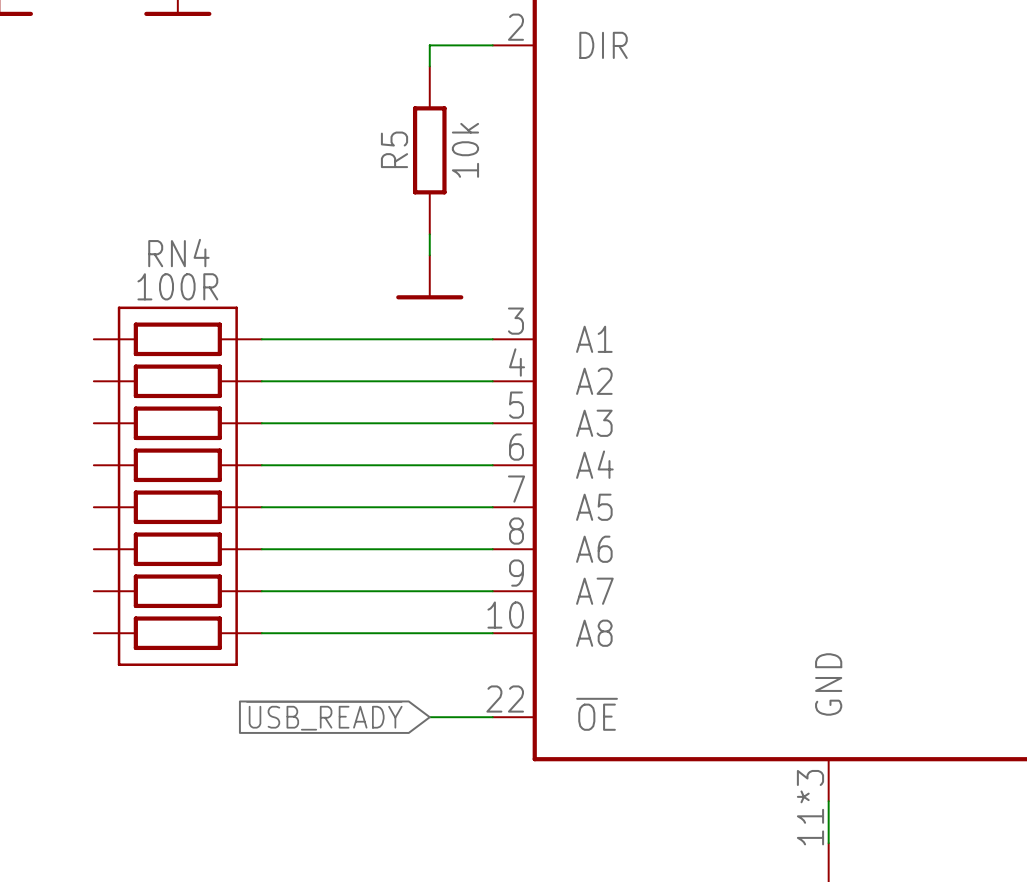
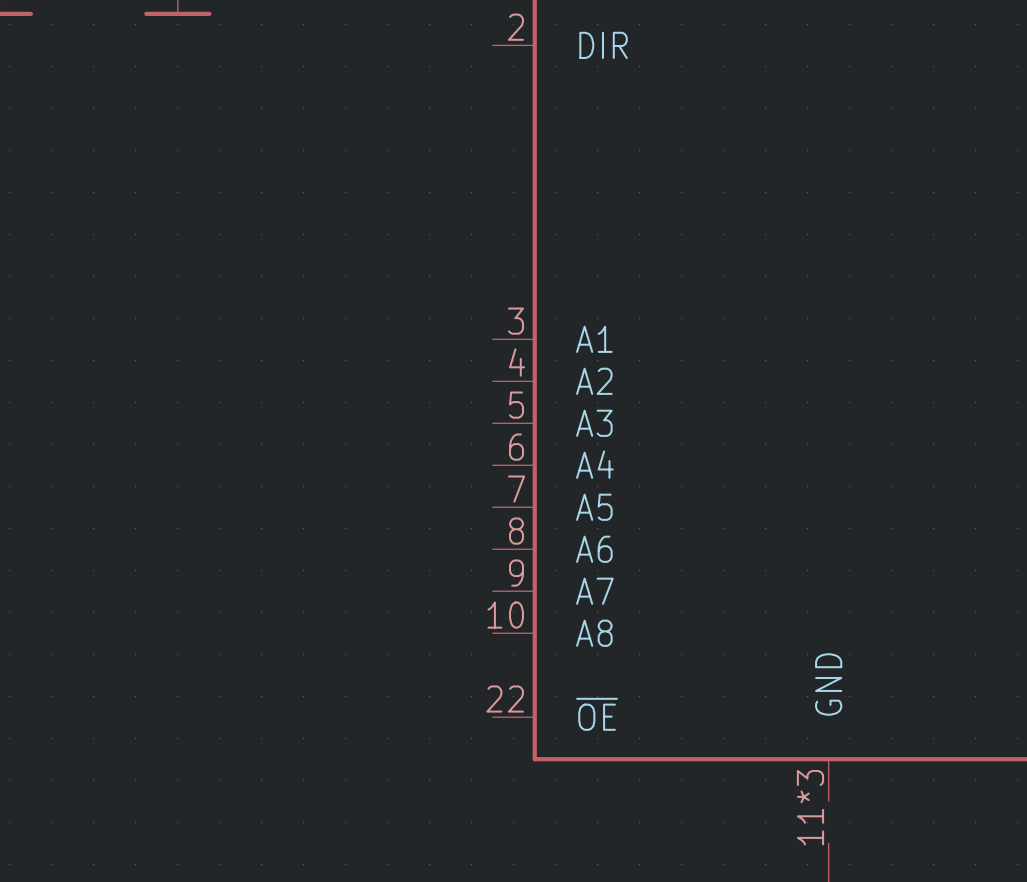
wire: (492, 45) (429, 45) (429, 66) -> none
R5: 10k (429, 150) -> none
wire: (429, 234) (429, 255) -> none
power symbol: (429, 277) -> none
wire: (261, 339) (492, 339) -> none
wire: (261, 381) (492, 381) -> none
wire: (261, 423) (492, 423) -> none
wire: (261, 465) (492, 465) -> none
RN4: 100R (177, 486) -> none
wire: (261, 507) (492, 507) -> none
wire: (261, 549) (492, 549) -> none
wire: (261, 591) (492, 591) -> none
wire: (261, 633) (492, 633) -> none
global label: ~{USB_READY} (324, 715) -> none
wire: (429, 717) (492, 717) -> none
wire: (828, 801) (828, 843) -> none

